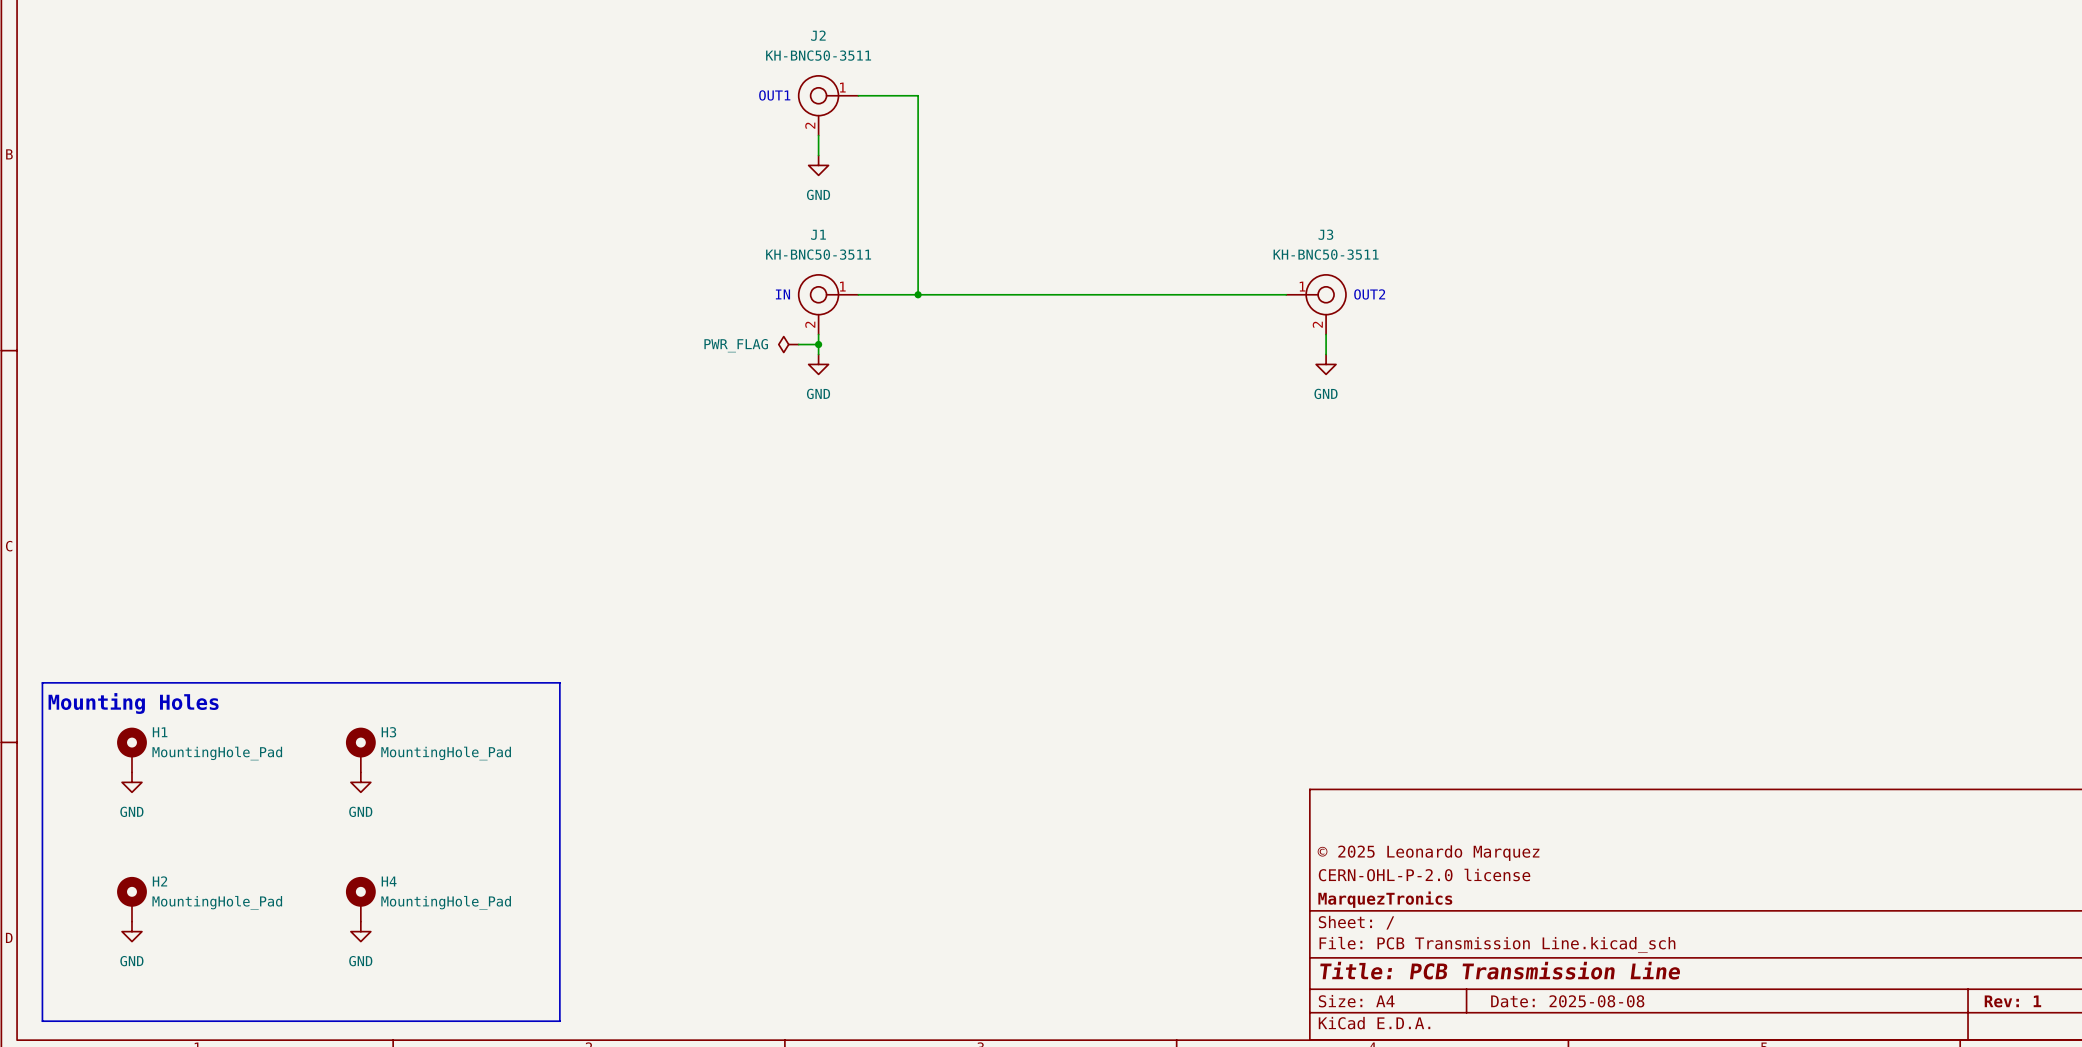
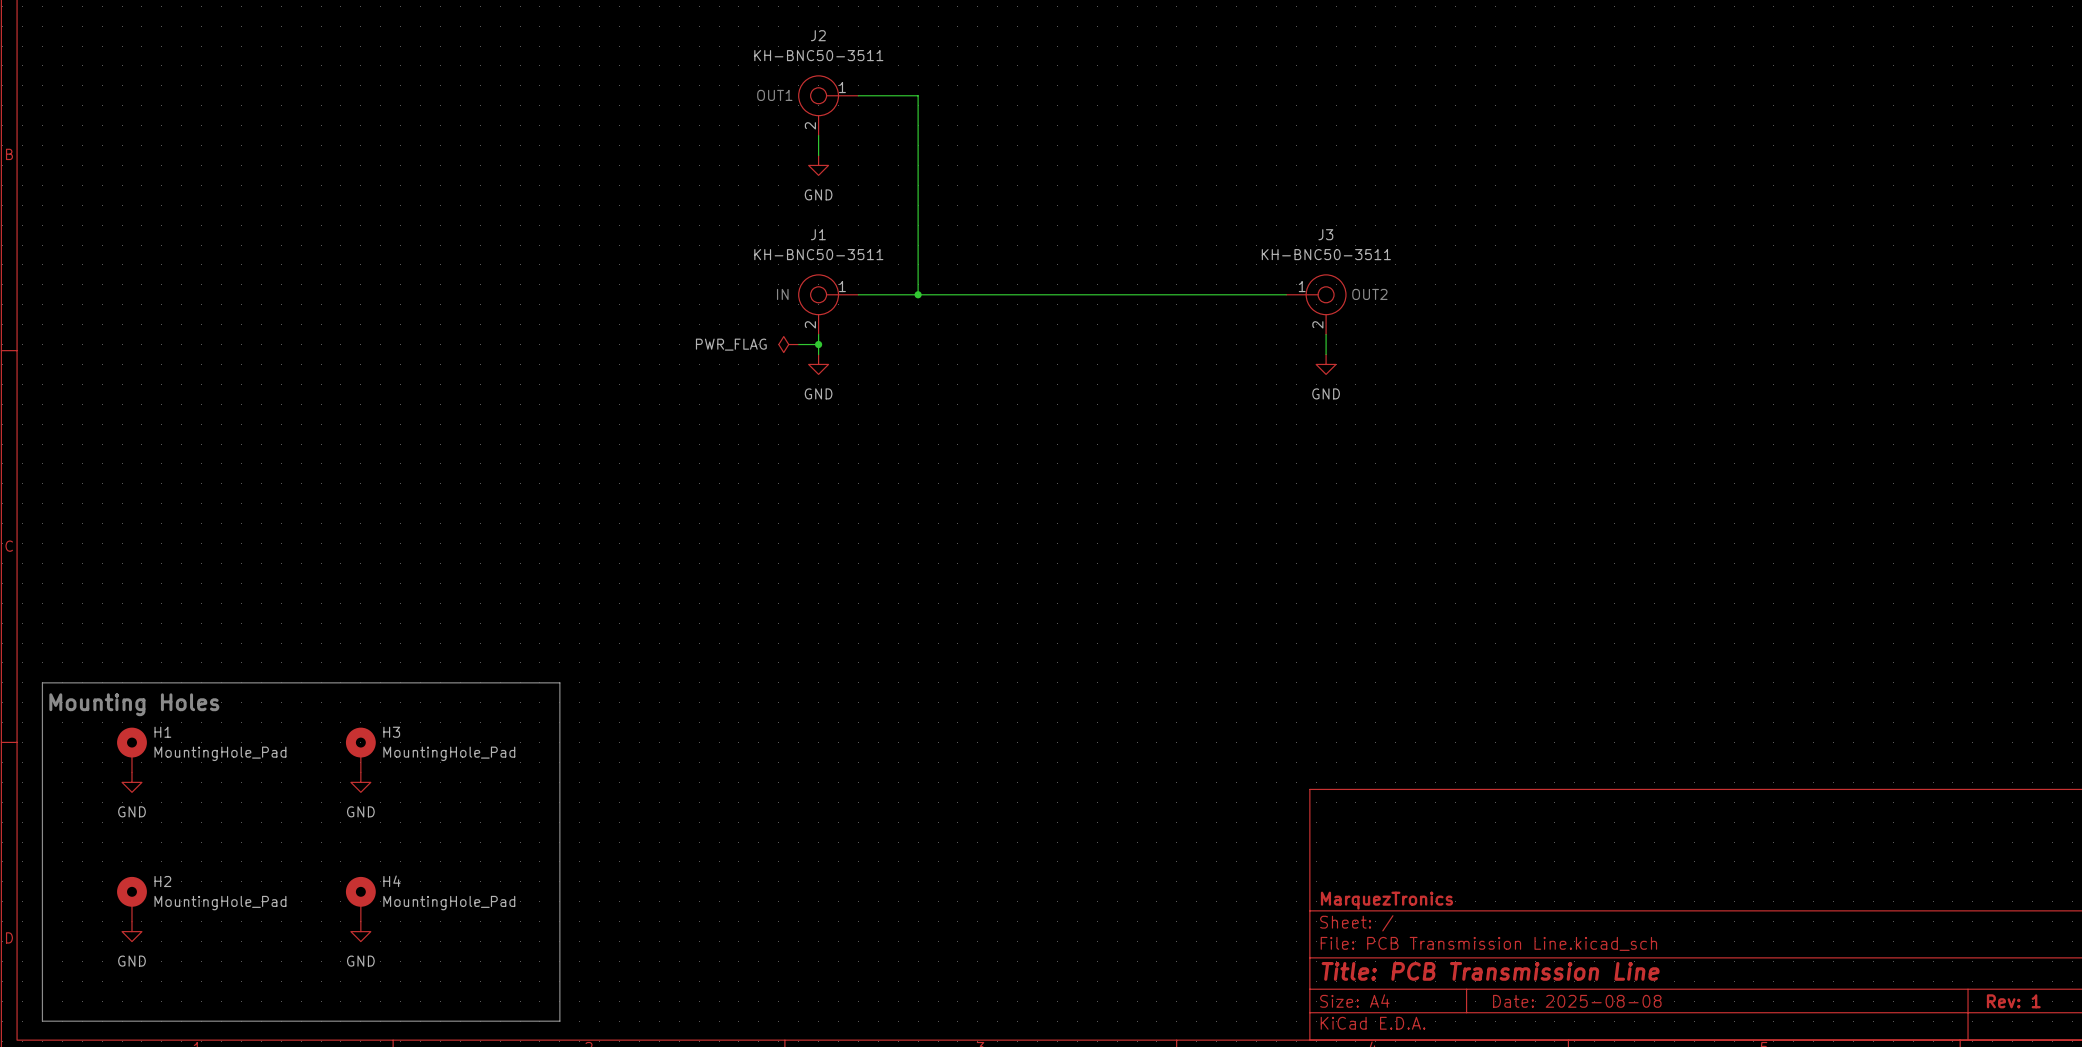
title block: © 2025 Leonardo Marquez (1428, 853) -> none
title block: CERN-OHL-P-2.0 license (1424, 874) -> none

